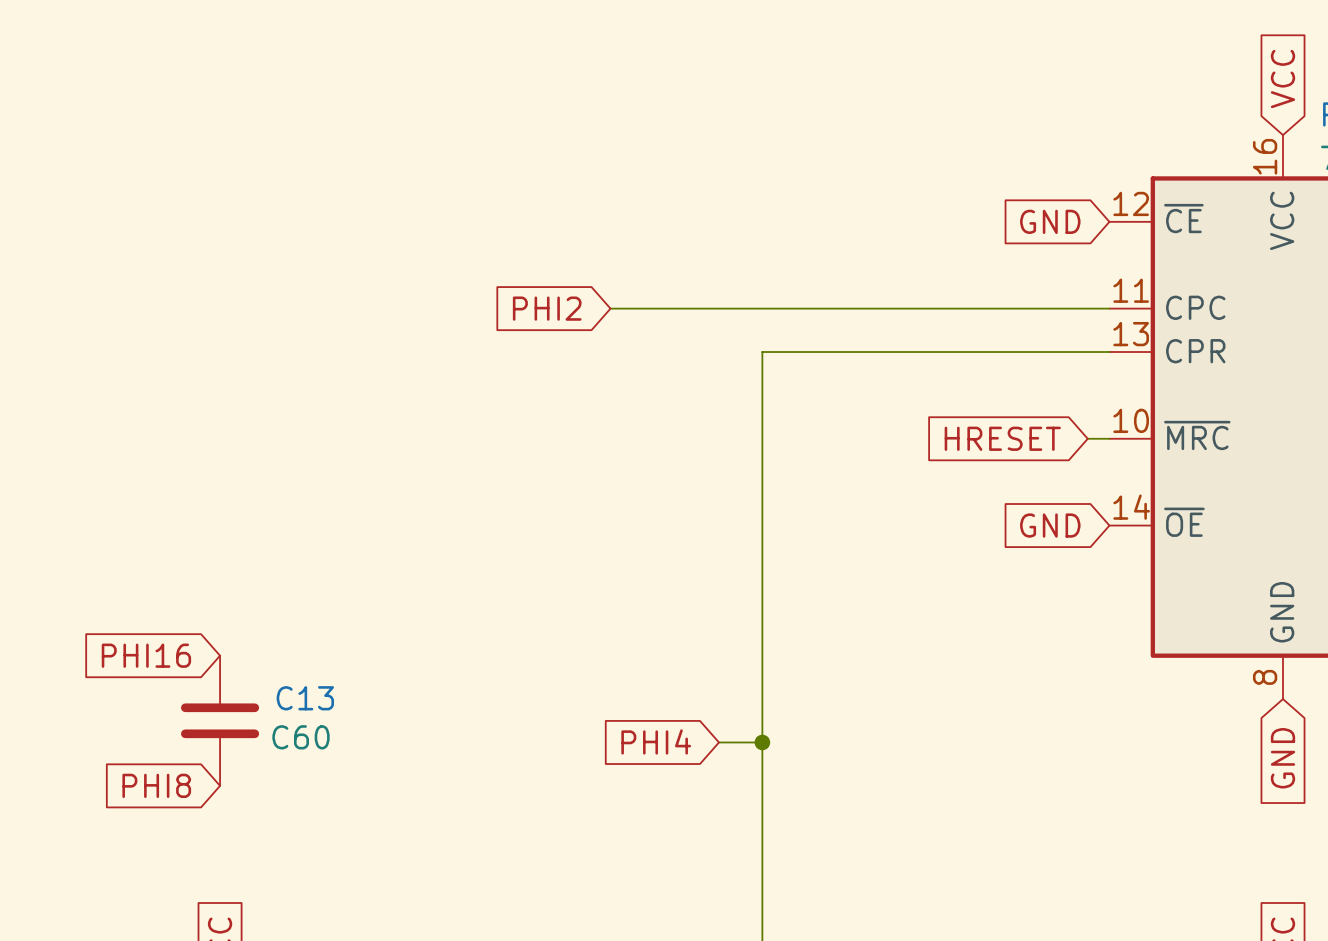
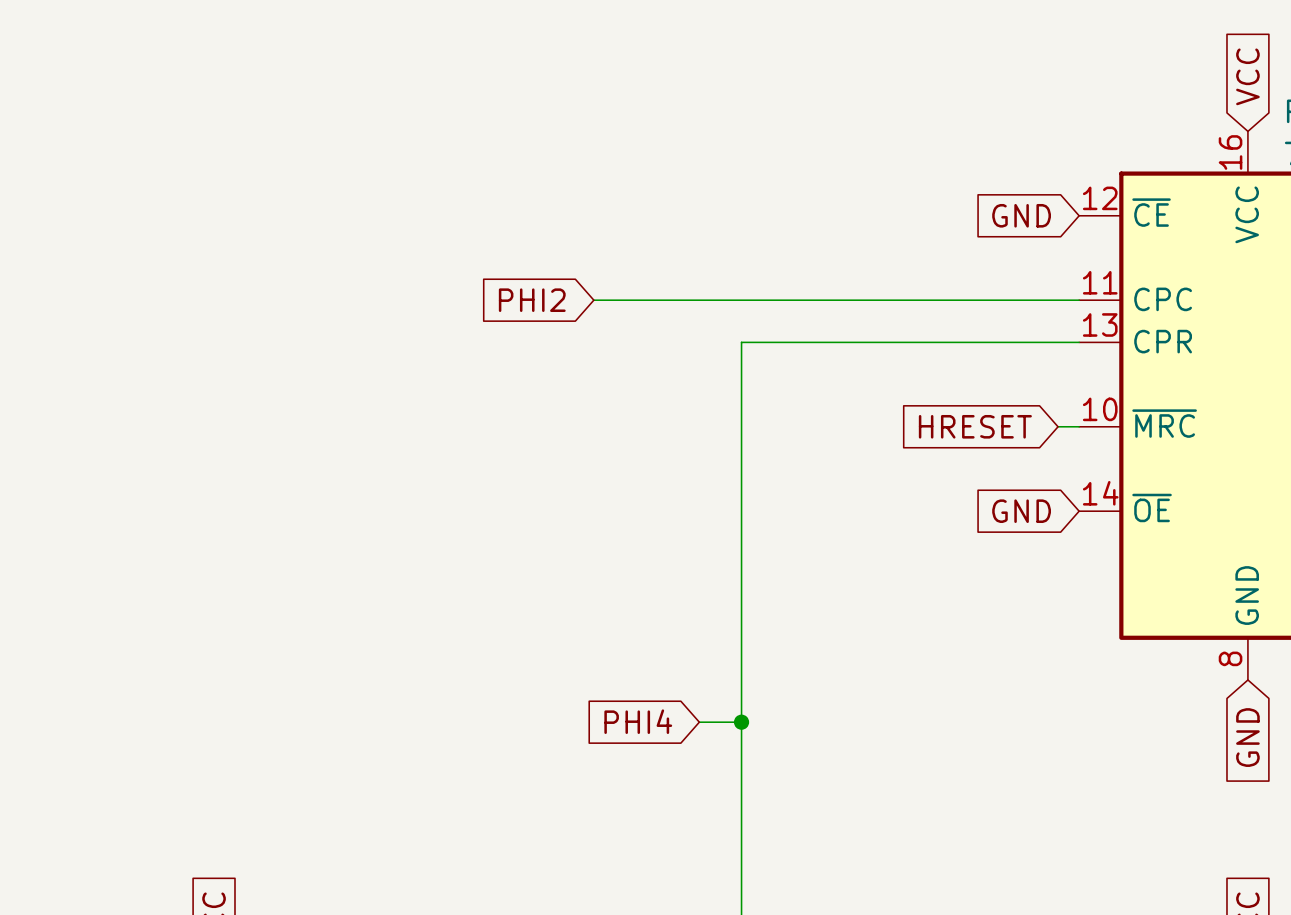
global label: PHI16 (146, 655) -> none
C13: C60 (220, 720) -> none
global label: PHI8 (156, 785) -> none

